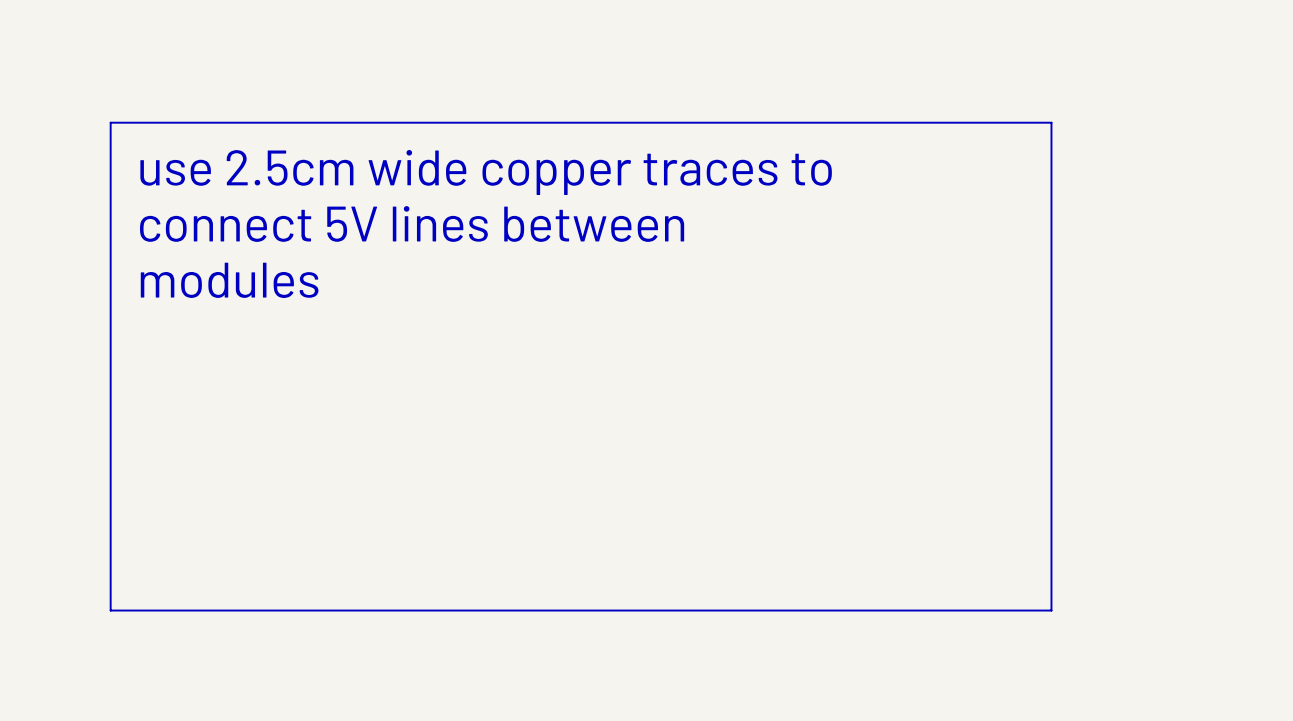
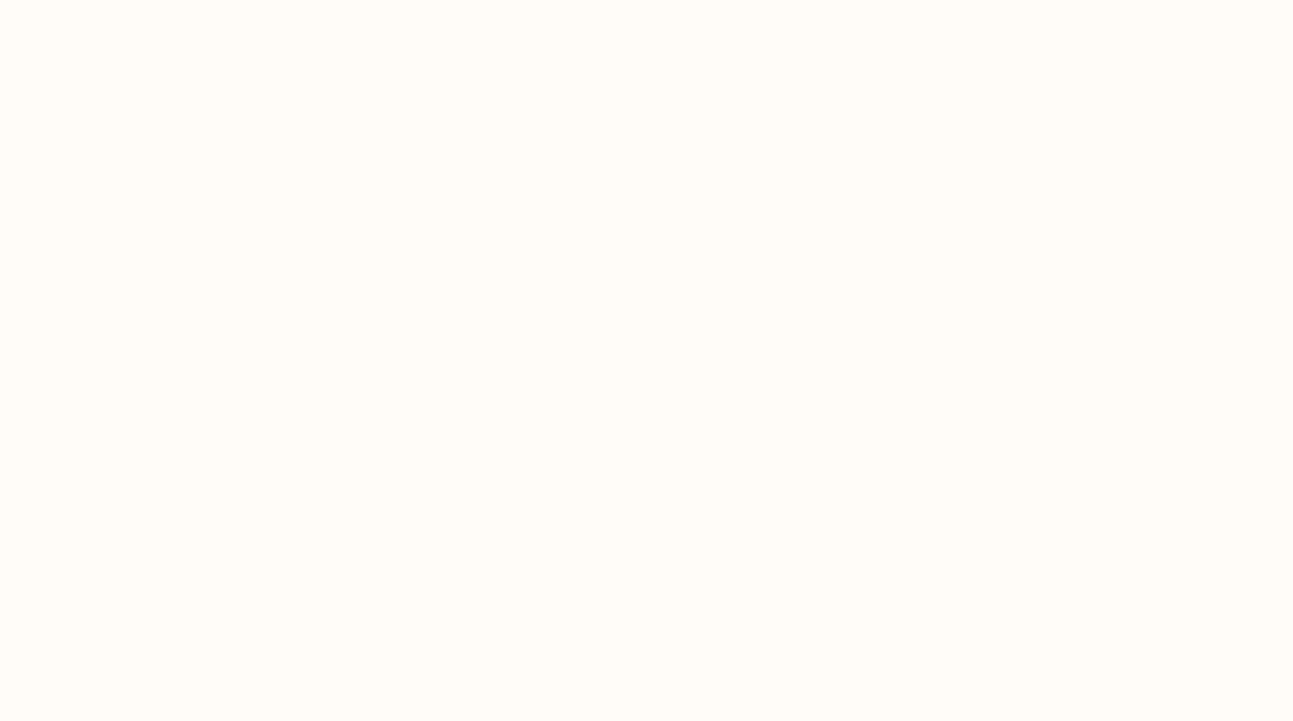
line: (110, 122) (1051, 122) (1051, 610) (110, 610) (110, 122) -> none
text: use 2.5cm wide copper traces to (486, 172) -> none
text: connect 5V lines between (412, 224) -> none
text: modules (229, 280) -> none

